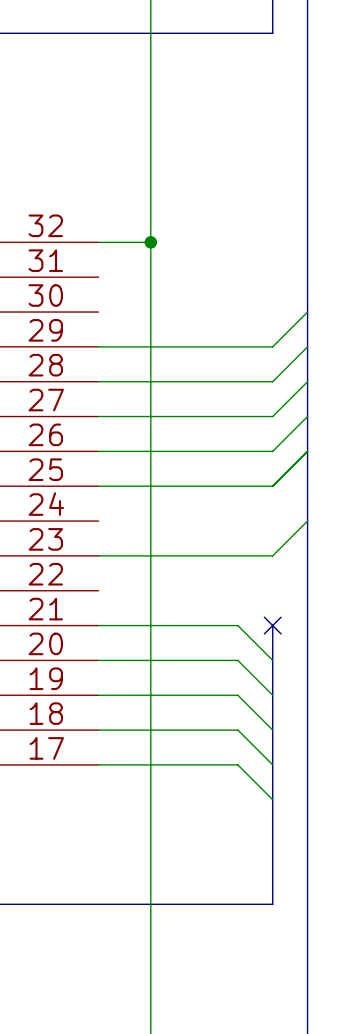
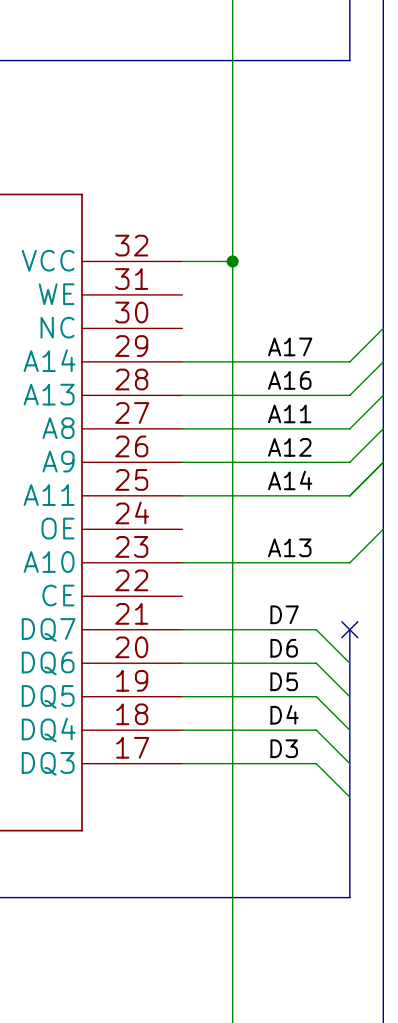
label: none -> A17 (290, 346)
label: none -> A16 (289, 380)
label: none -> A11 (289, 413)
label: none -> A12 (289, 447)
label: none -> A14 (290, 480)
label: none -> A13 (289, 547)
label: none -> D7 (284, 614)
label: none -> D6 (284, 648)
label: none -> D5 (284, 681)
label: none -> D4 (284, 714)
label: none -> D3 (284, 748)

